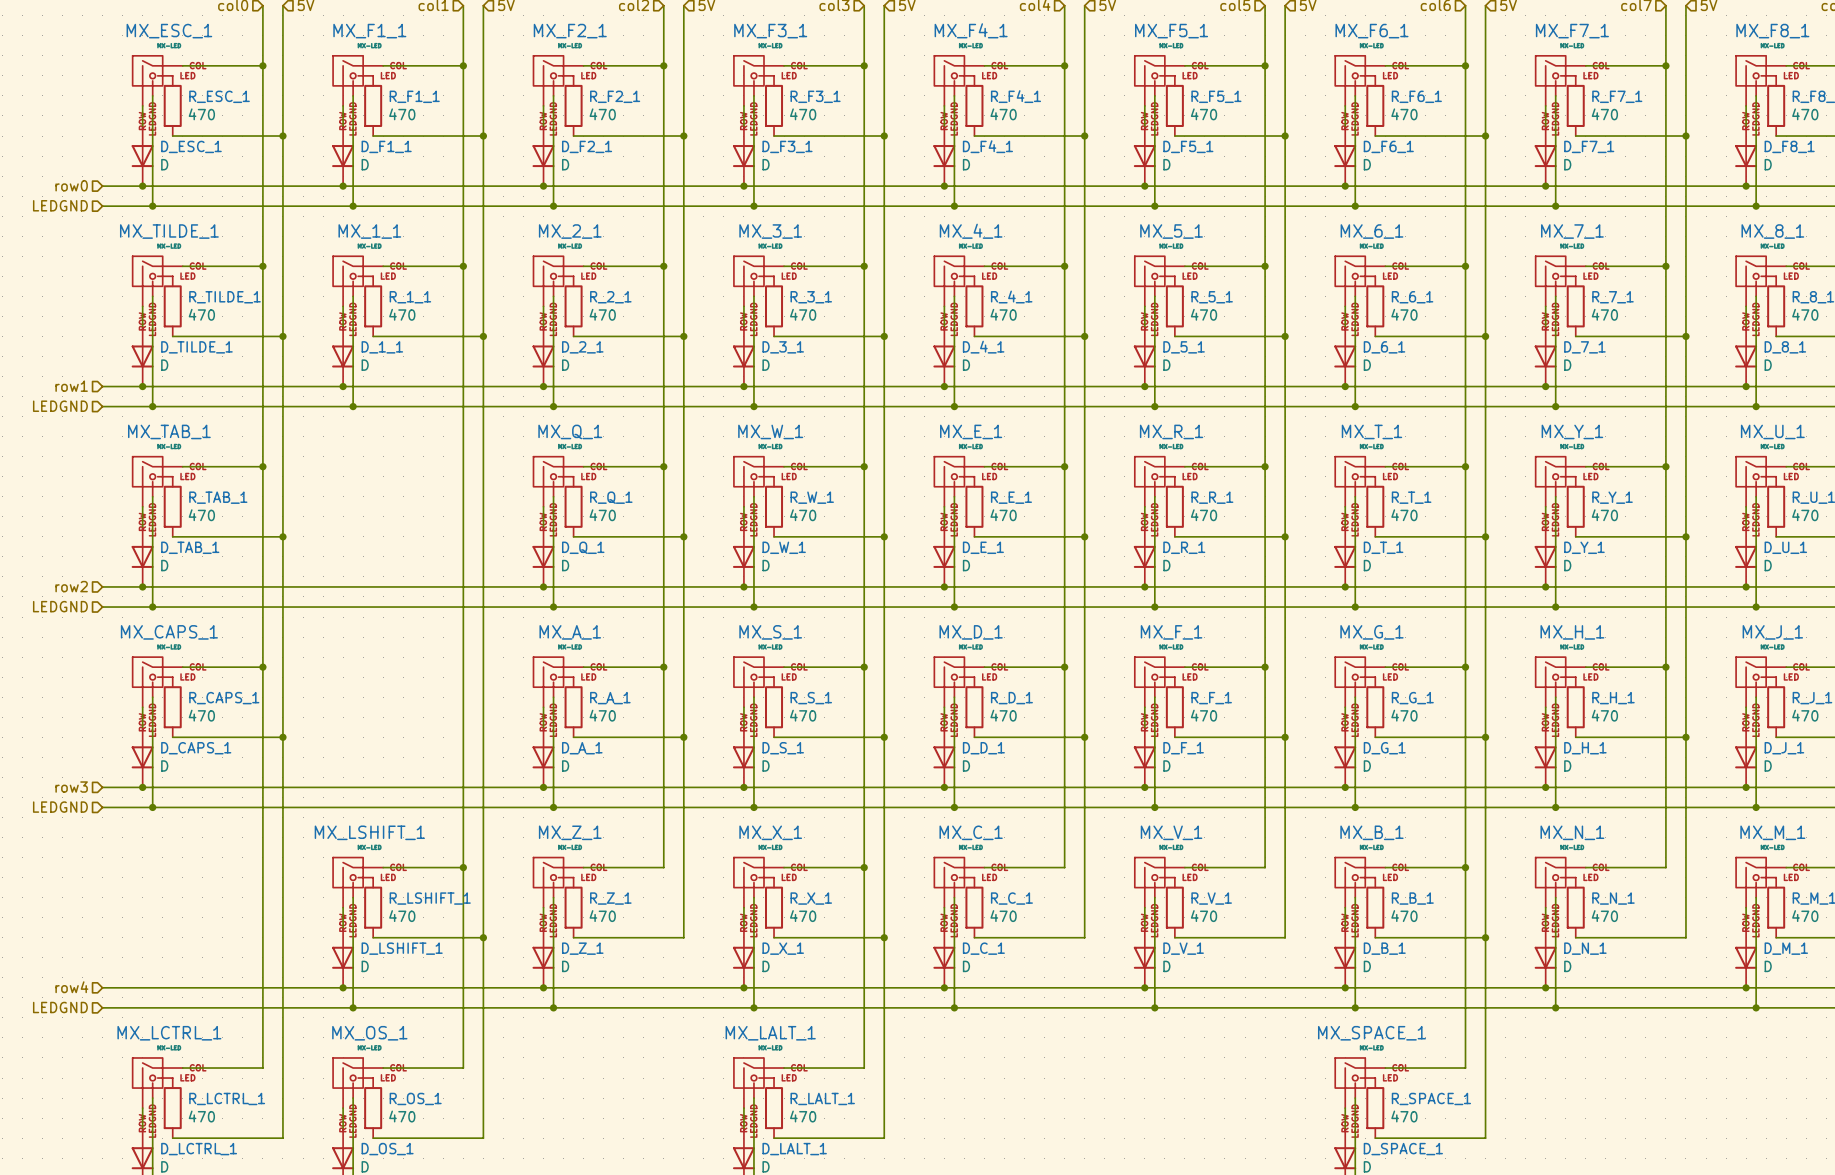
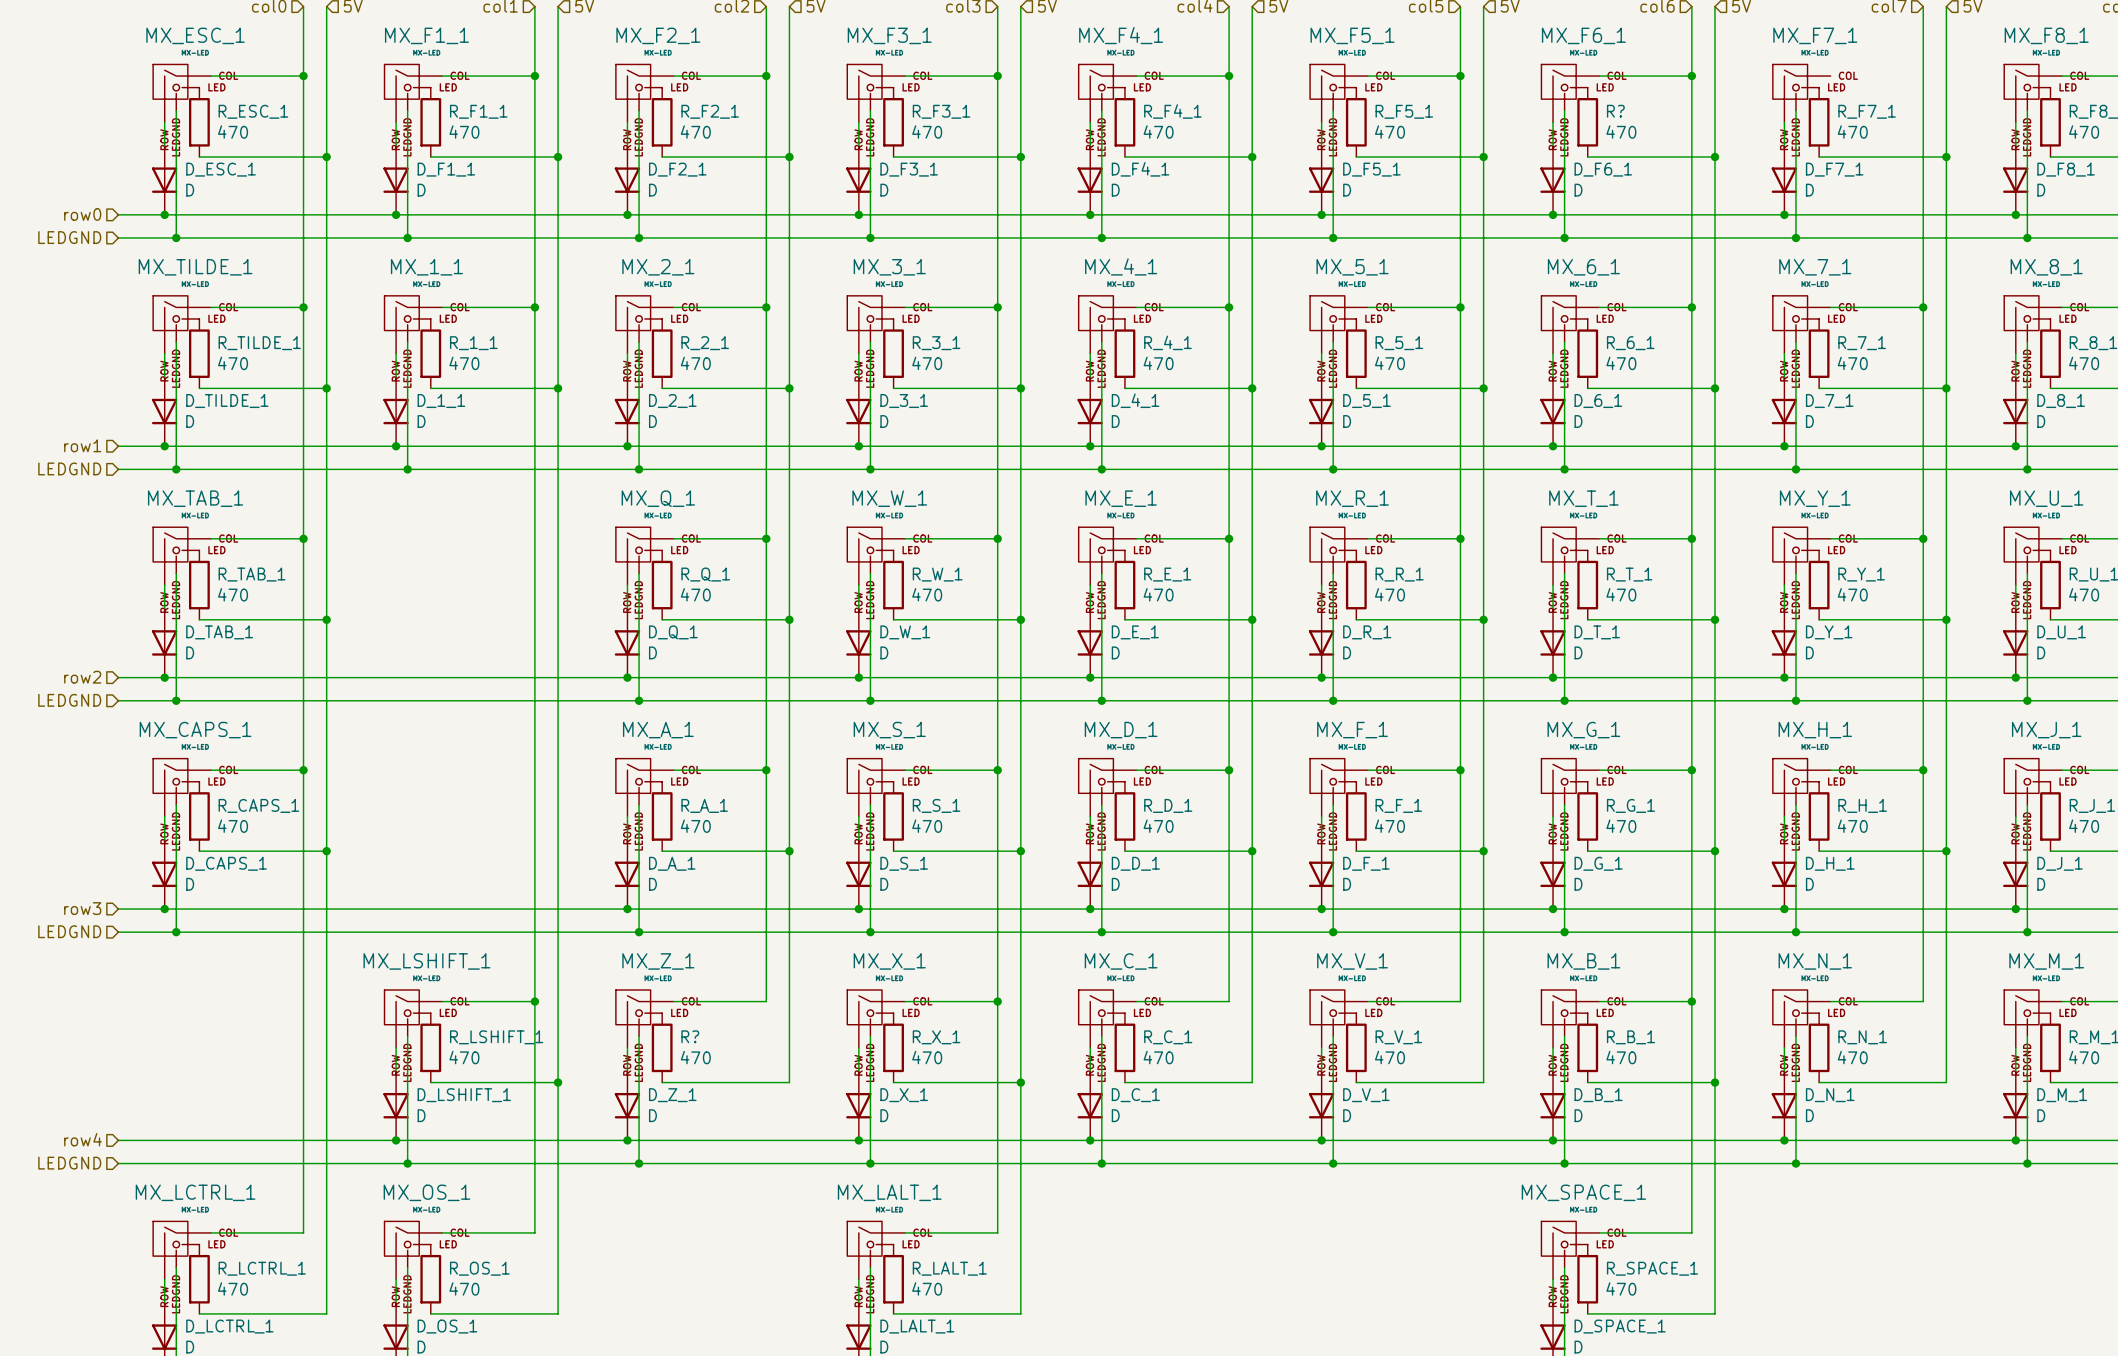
wire: (1585, 65) (1665, 65) -> none
junction: (1665, 65) -> none
R_F6_1 name: R_F6_1 (1416, 96) -> R? (1615, 111)
R_Z_1 name: R_Z_1 (610, 898) -> R? (690, 1036)

